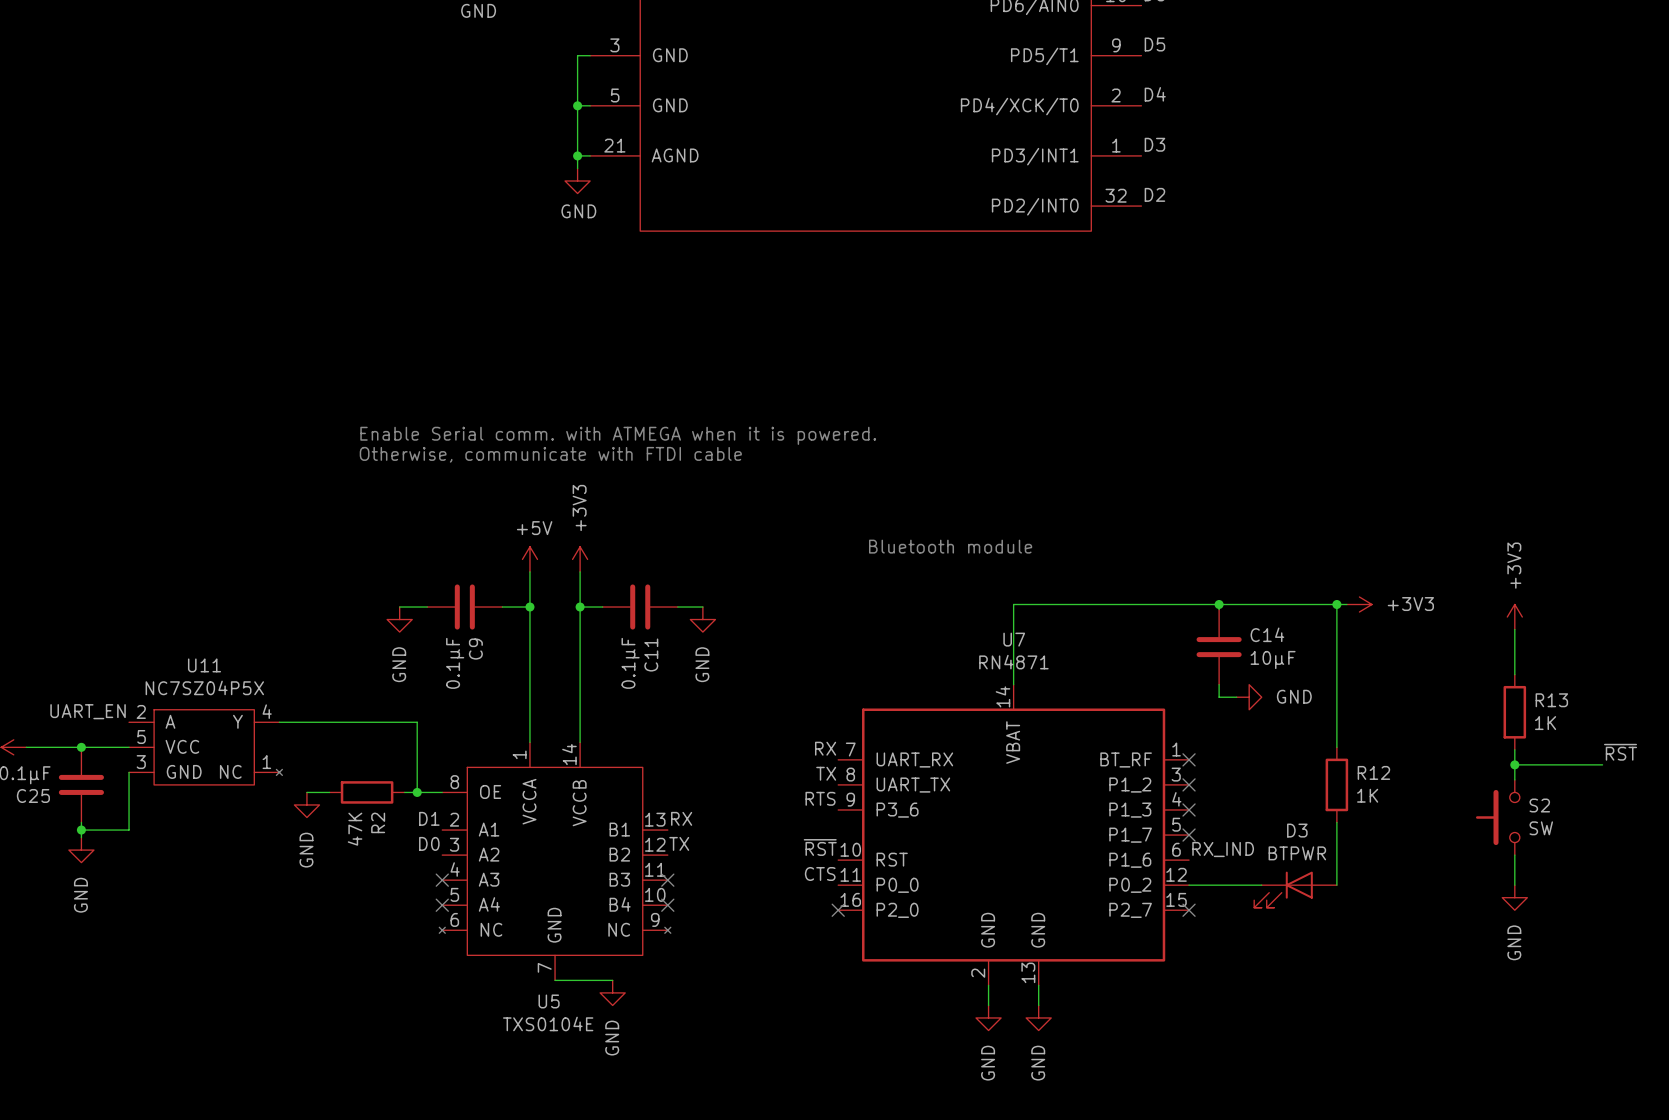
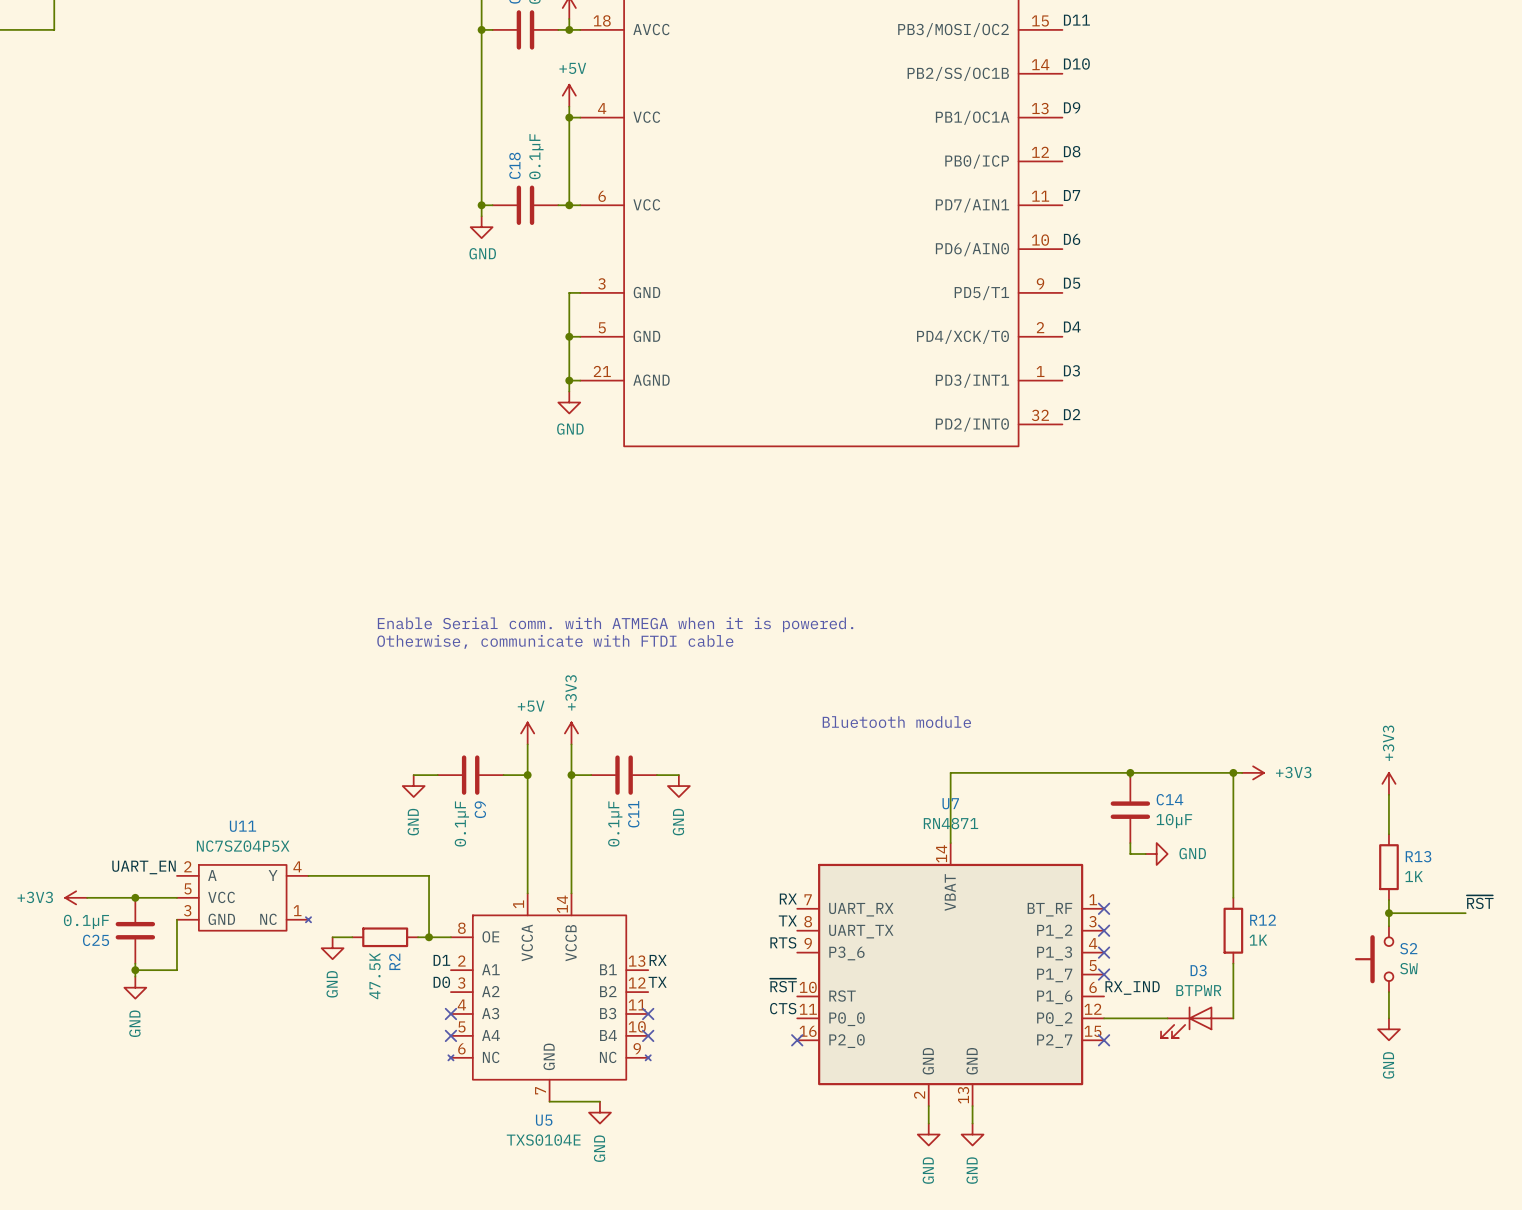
R2 value: 47K (355, 829) -> 47.5K (375, 976)

